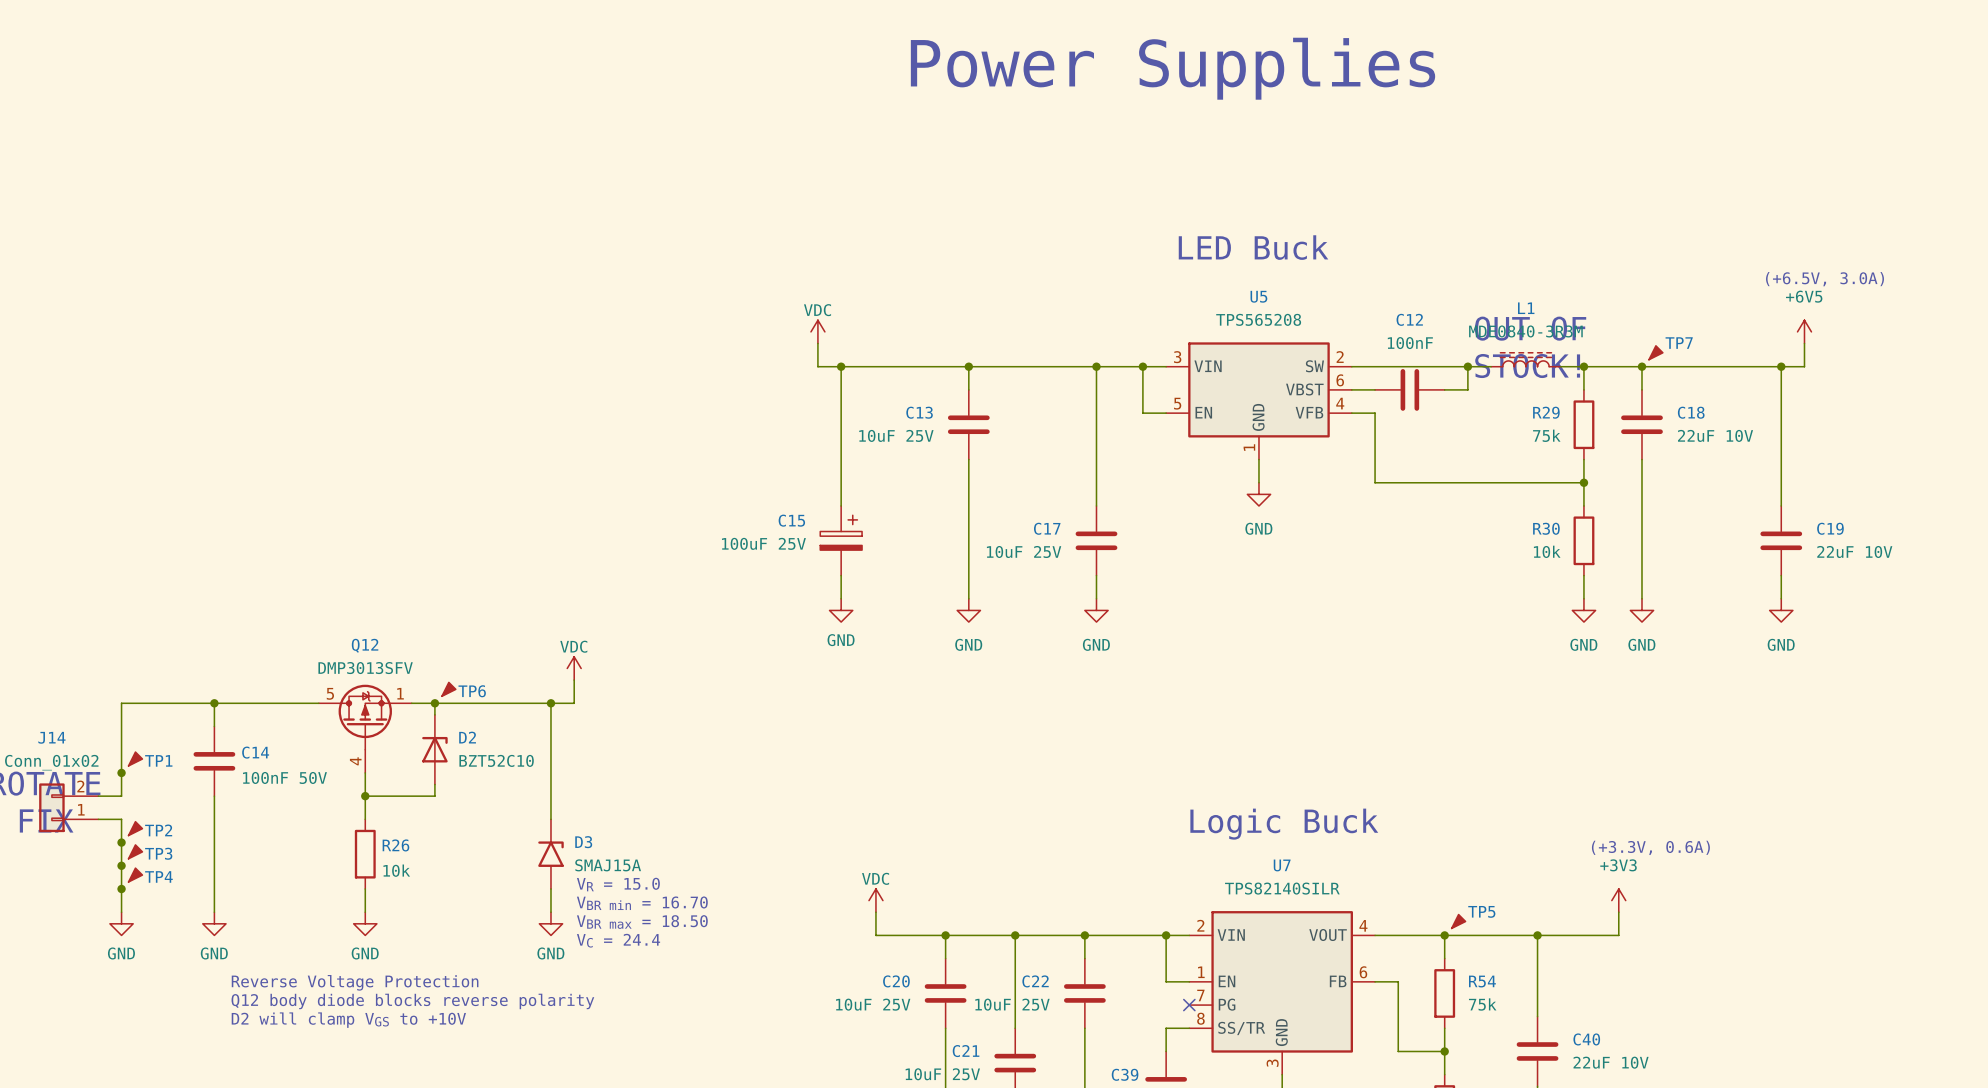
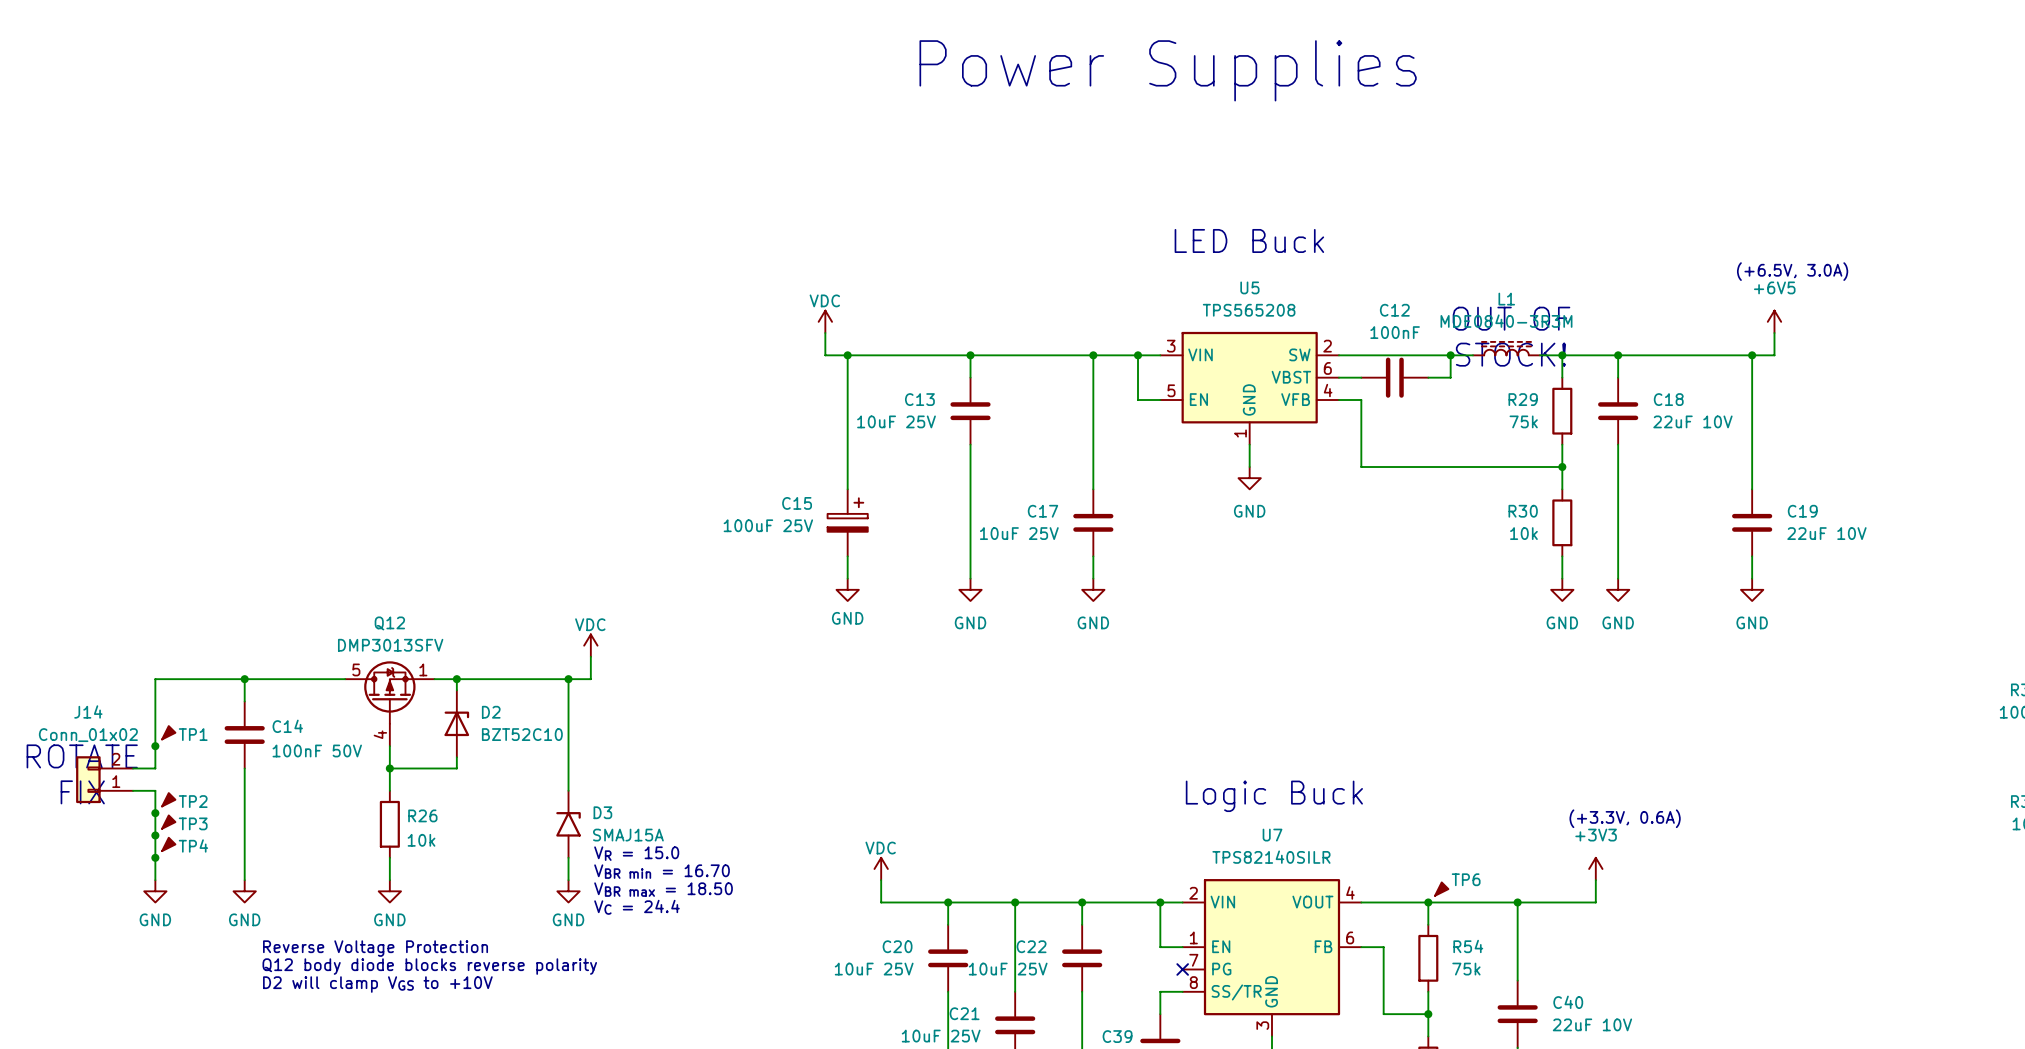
TP7: (1655, 352) -> none
TP6: (448, 689) -> none
TP5 name: TP5 (1481, 911) -> TP6 (1466, 879)

